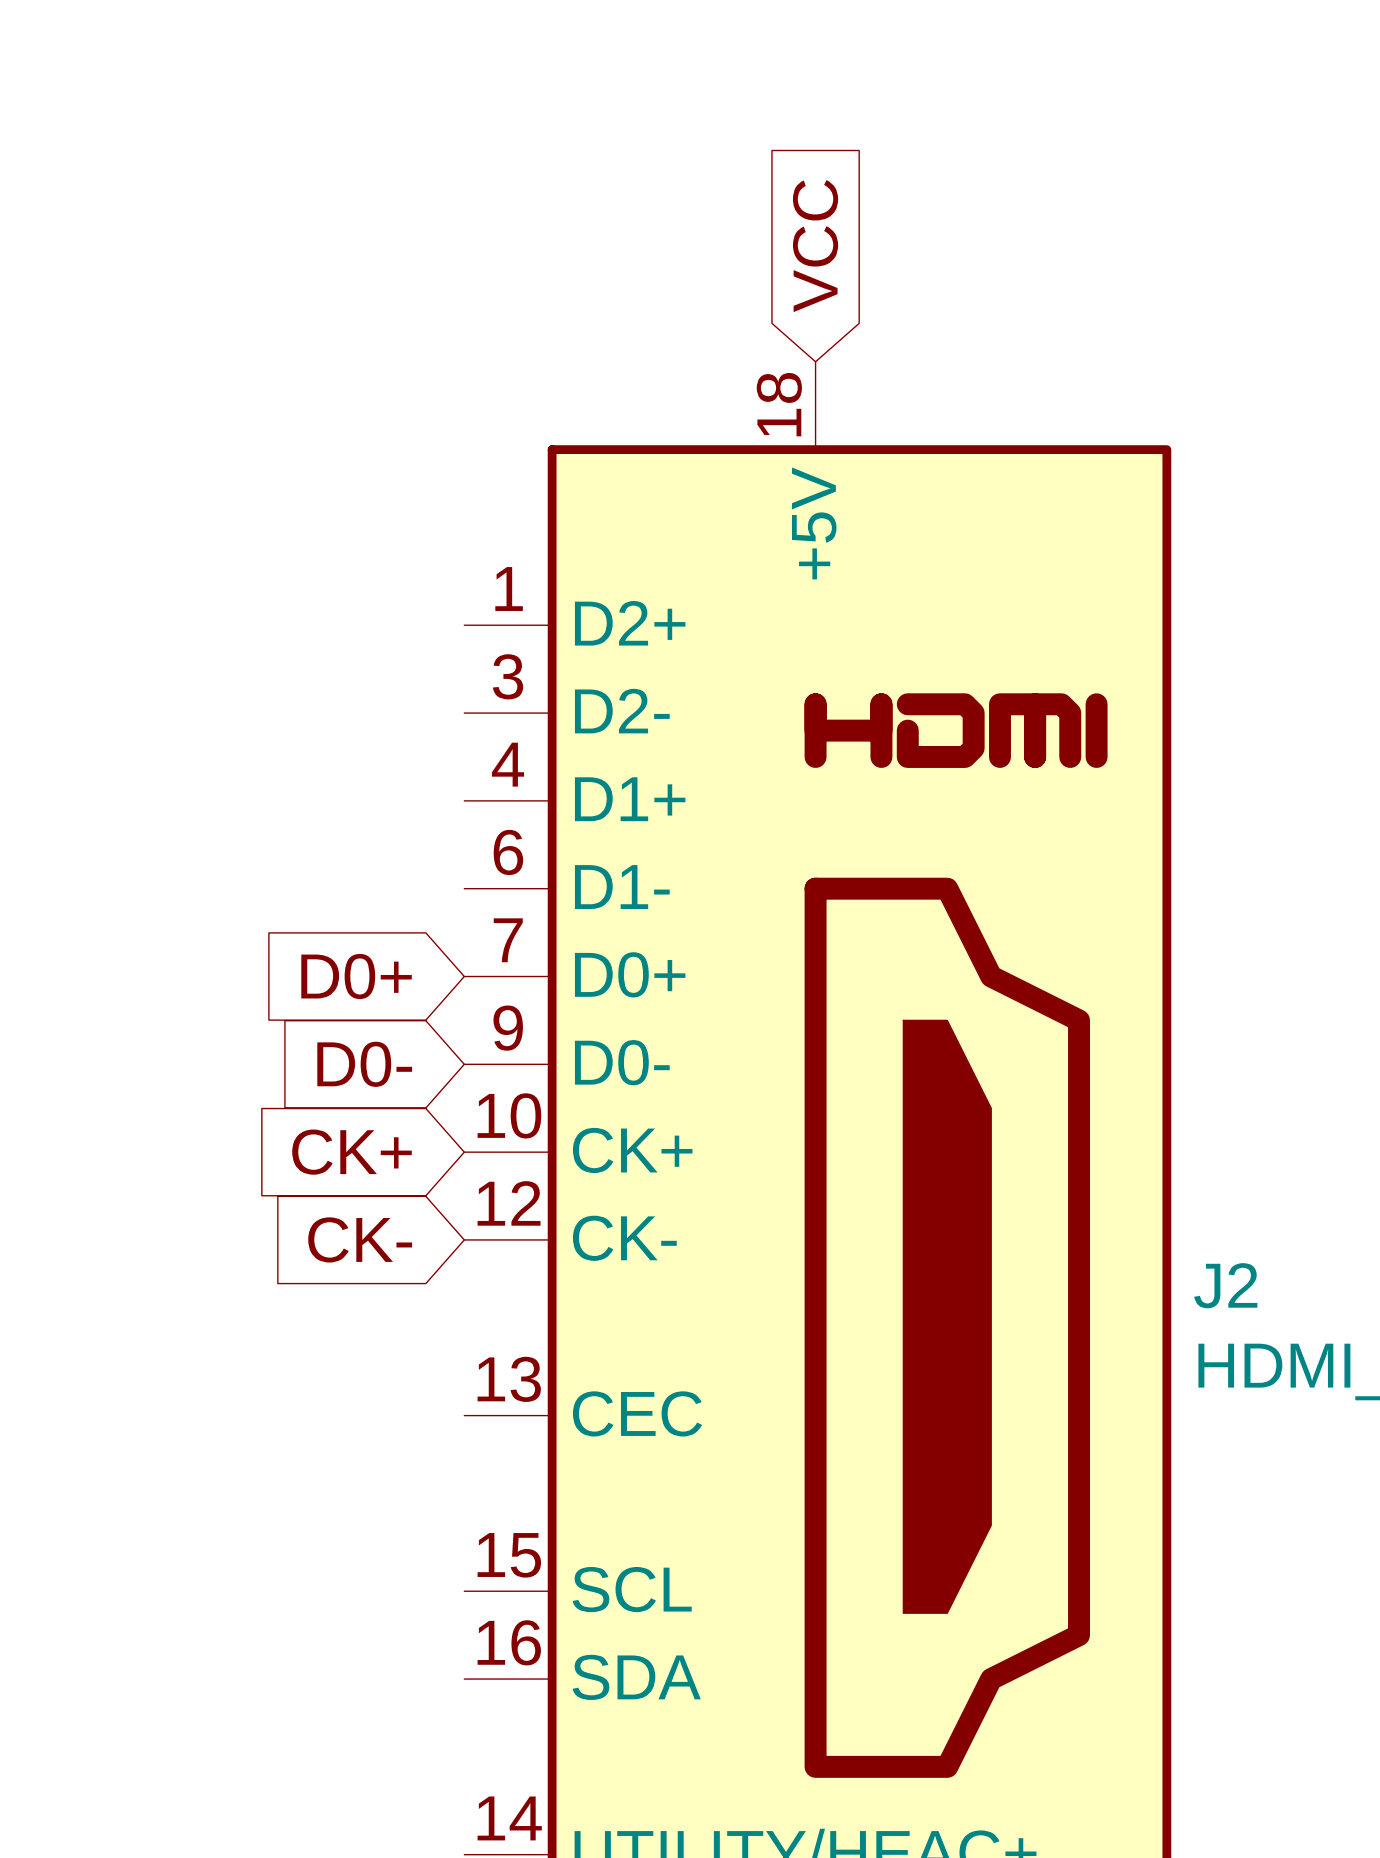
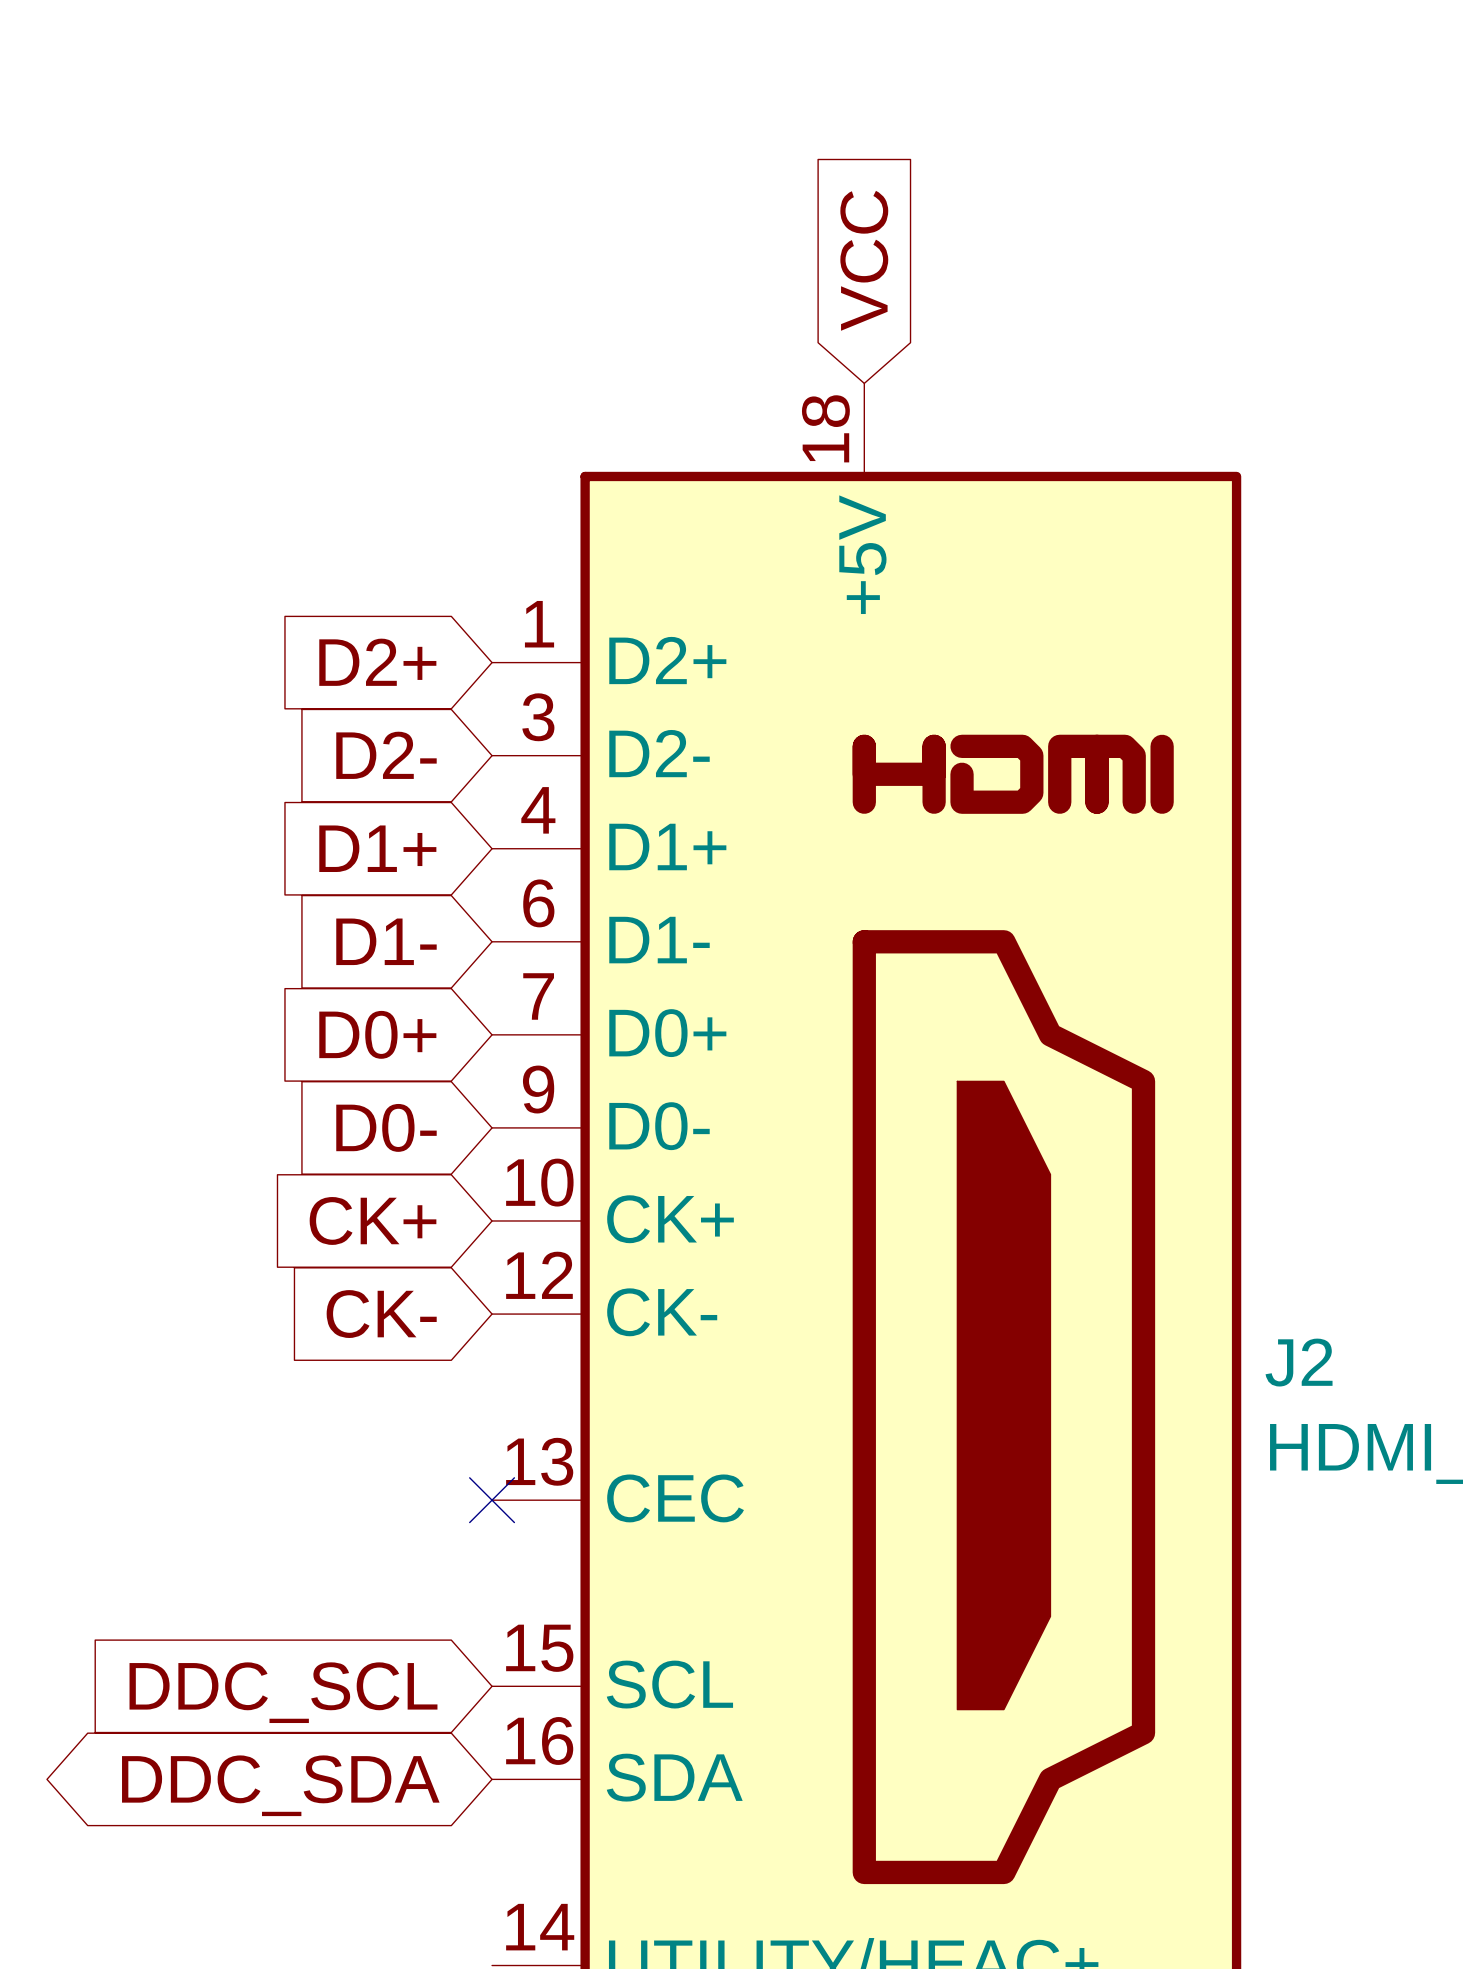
global label: none -> D2+ (377, 662)
global label: none -> D2- (386, 755)
global label: none -> D1+ (377, 848)
global label: none -> D1- (386, 941)
no-connect mark: none -> (492, 1500)
global label: none -> DDC_SCL (283, 1692)
global label: none -> DDC_SDA (280, 1785)

